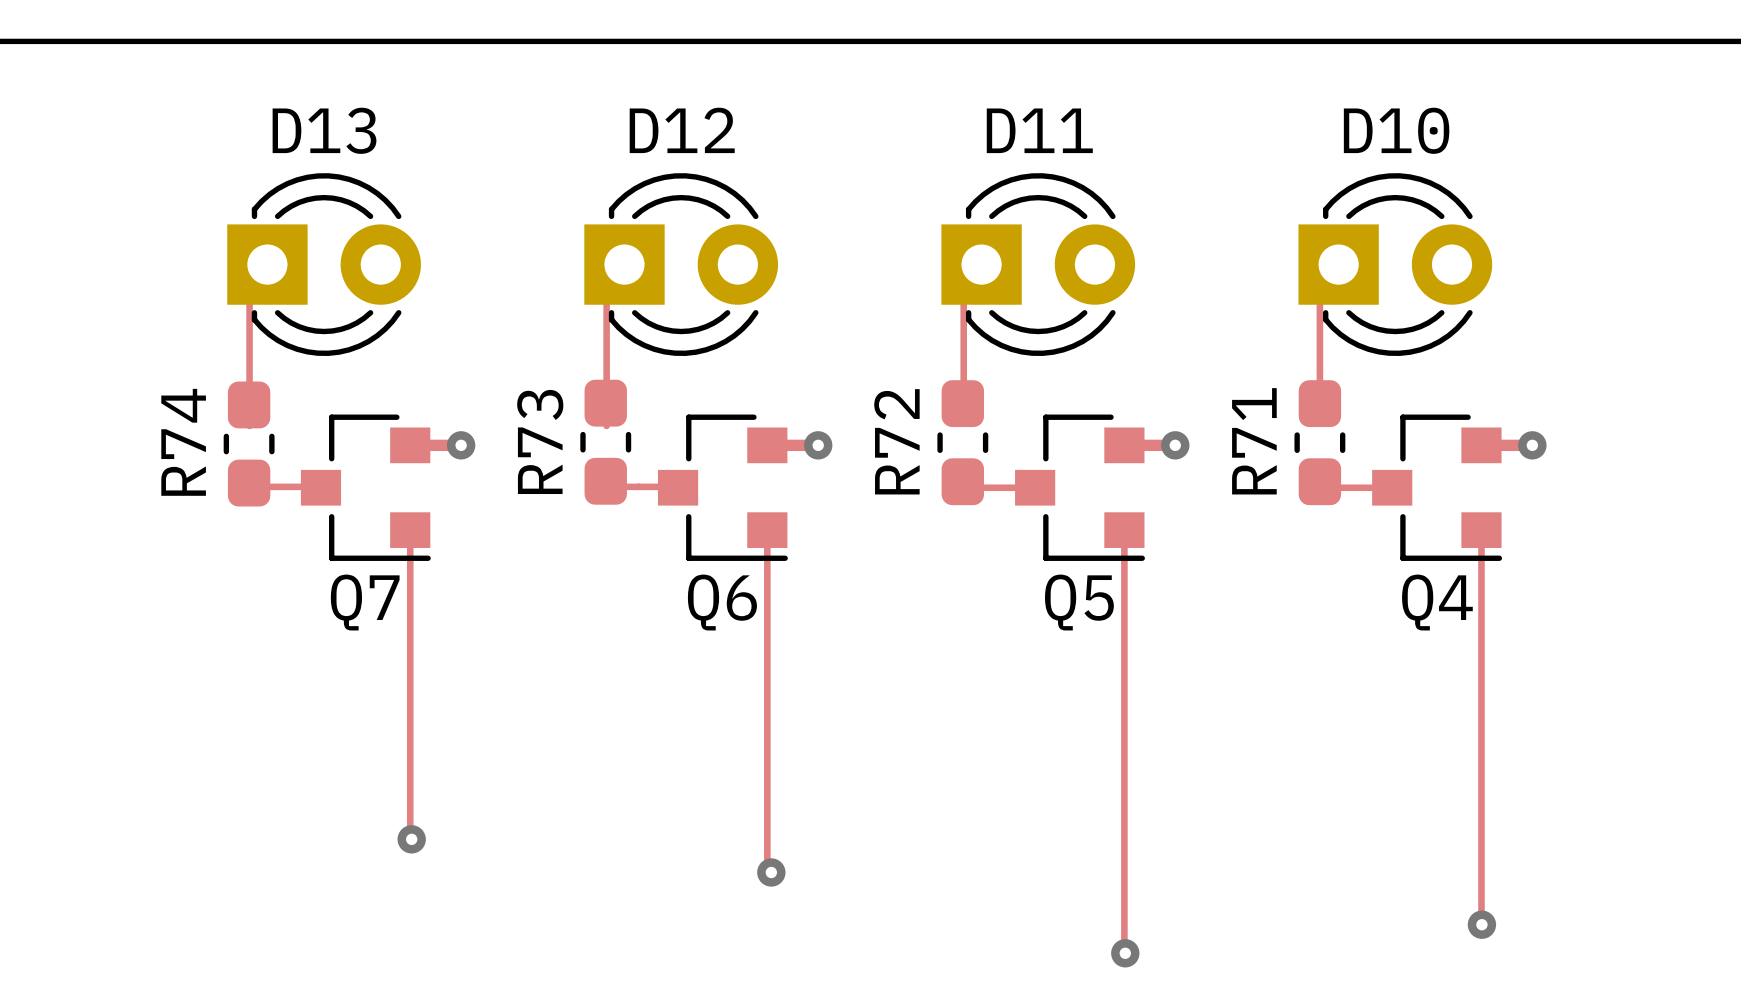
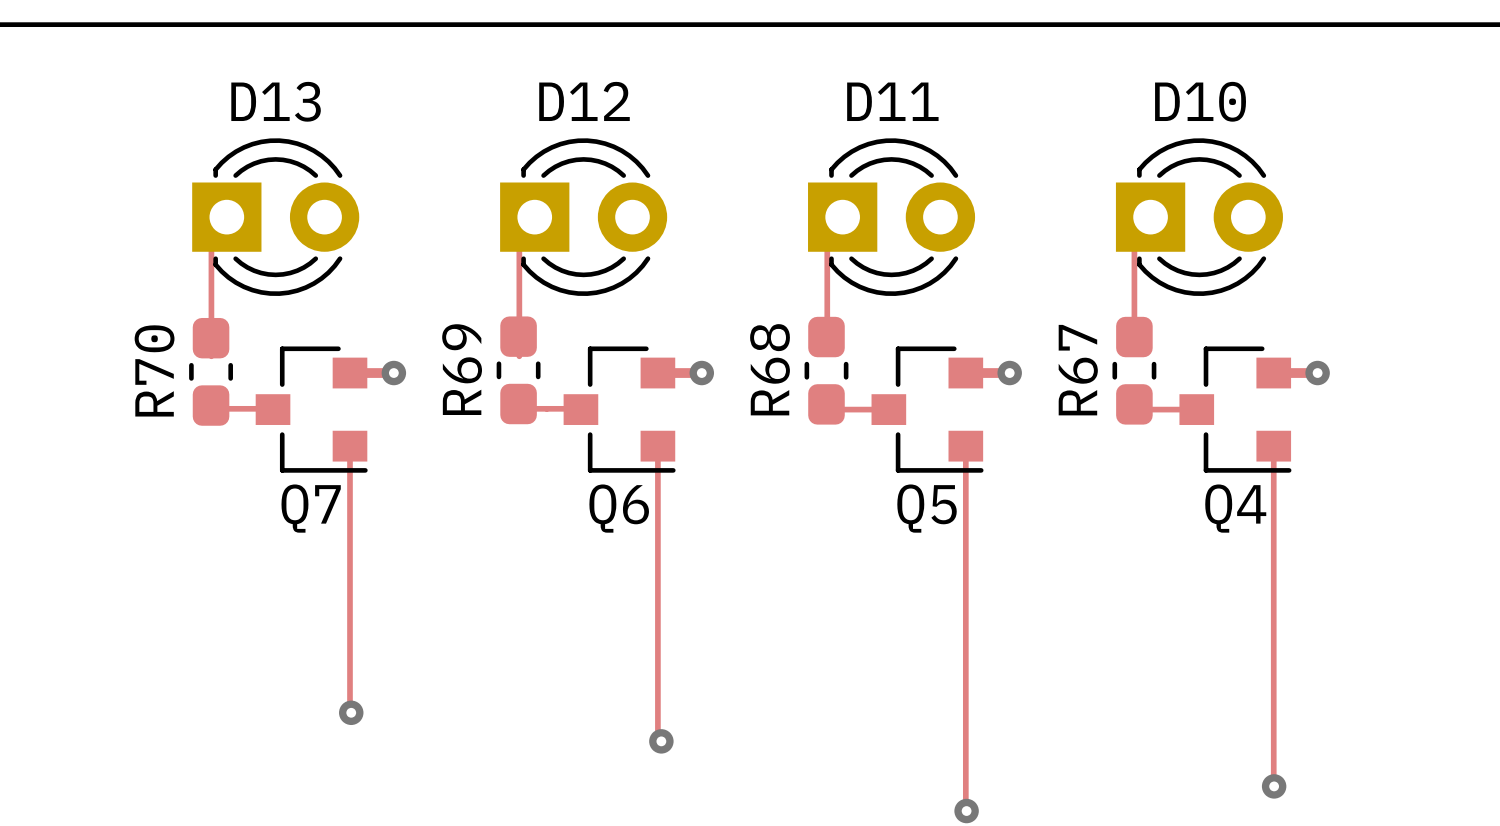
R73 name: R73 (540, 441) -> R69 (462, 369)
R72 name: R72 (896, 441) -> R68 (770, 369)
R71 name: R71 (1254, 441) -> R67 (1078, 370)
R74 name: R74 (183, 442) -> R70 (154, 370)

